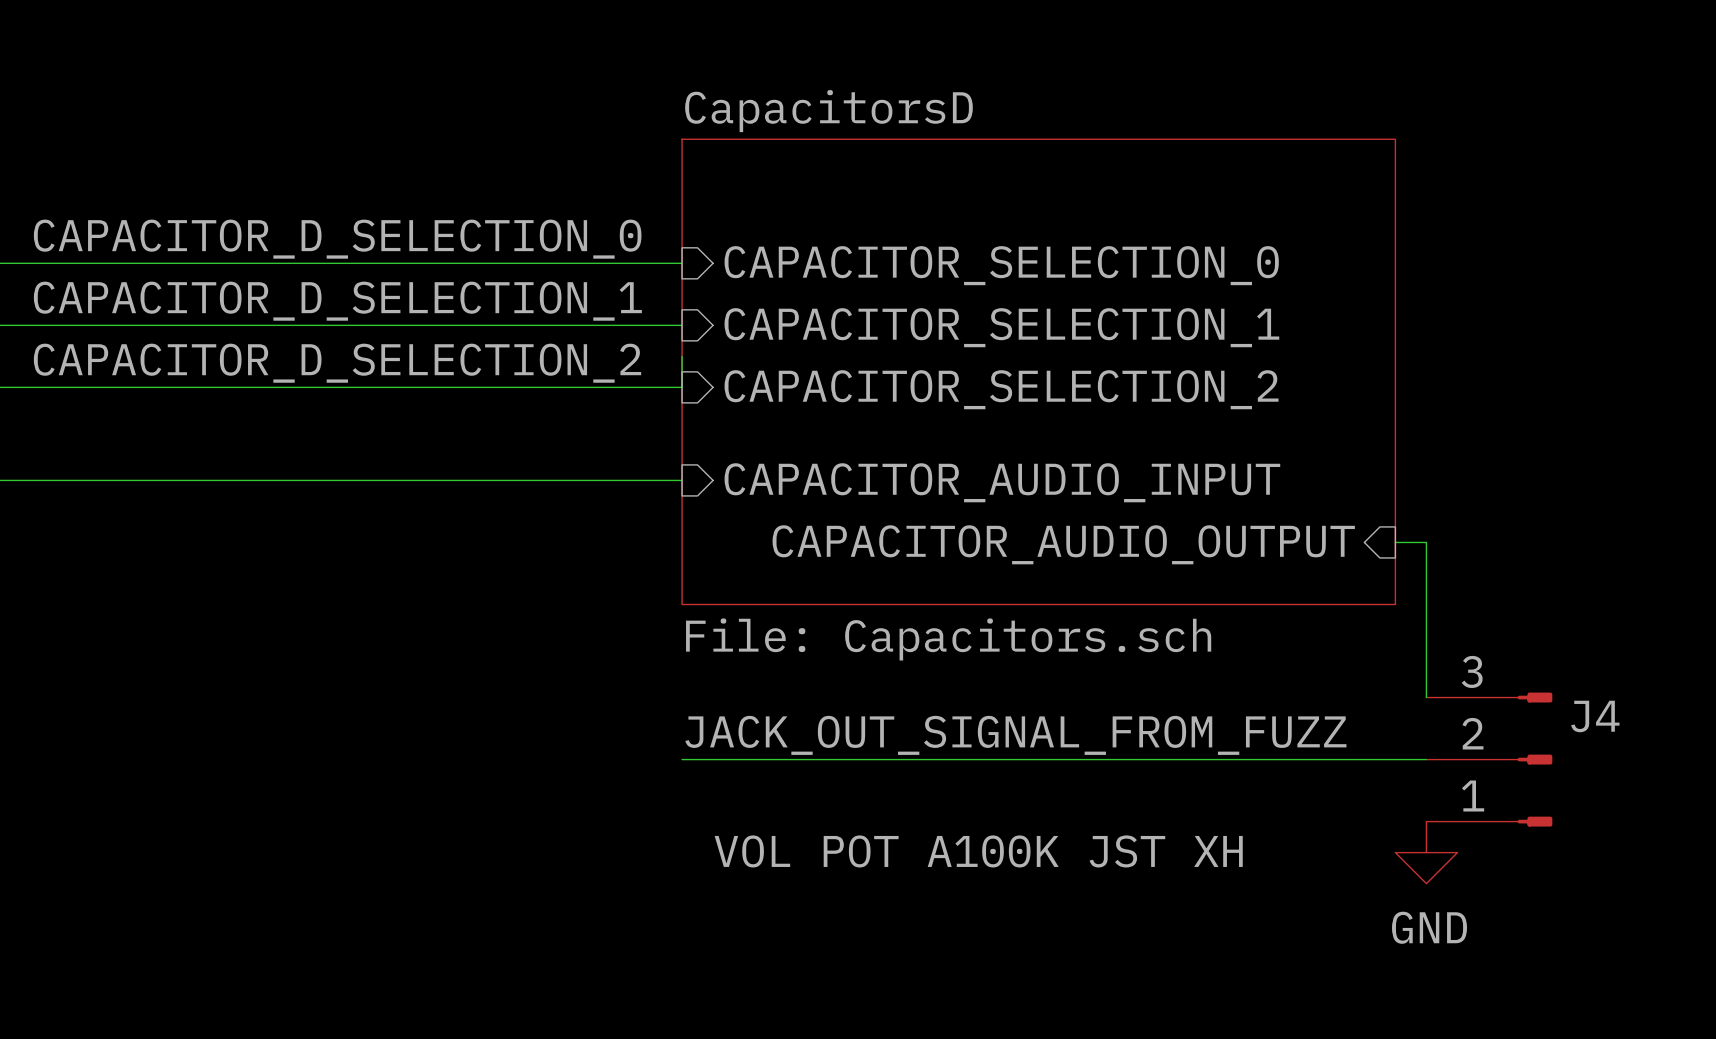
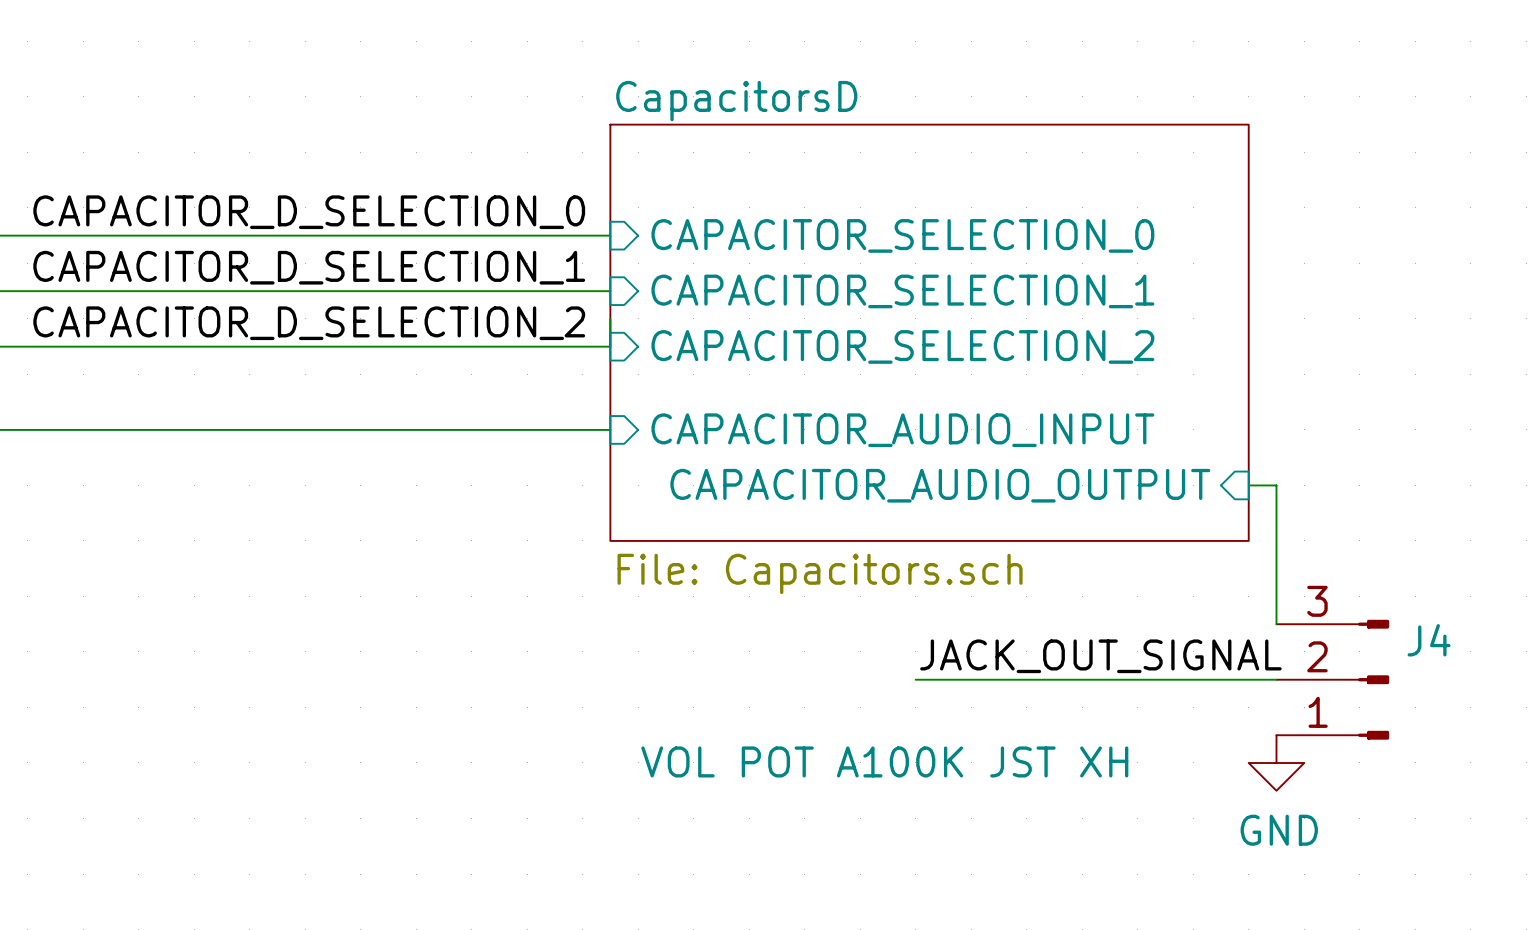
label: JACK_OUT_SIGNAL_FROM_FUZZ (1015, 735) -> JACK_OUT_SIGNAL (1100, 656)
wire: (682, 759) (1023, 759) -> none

